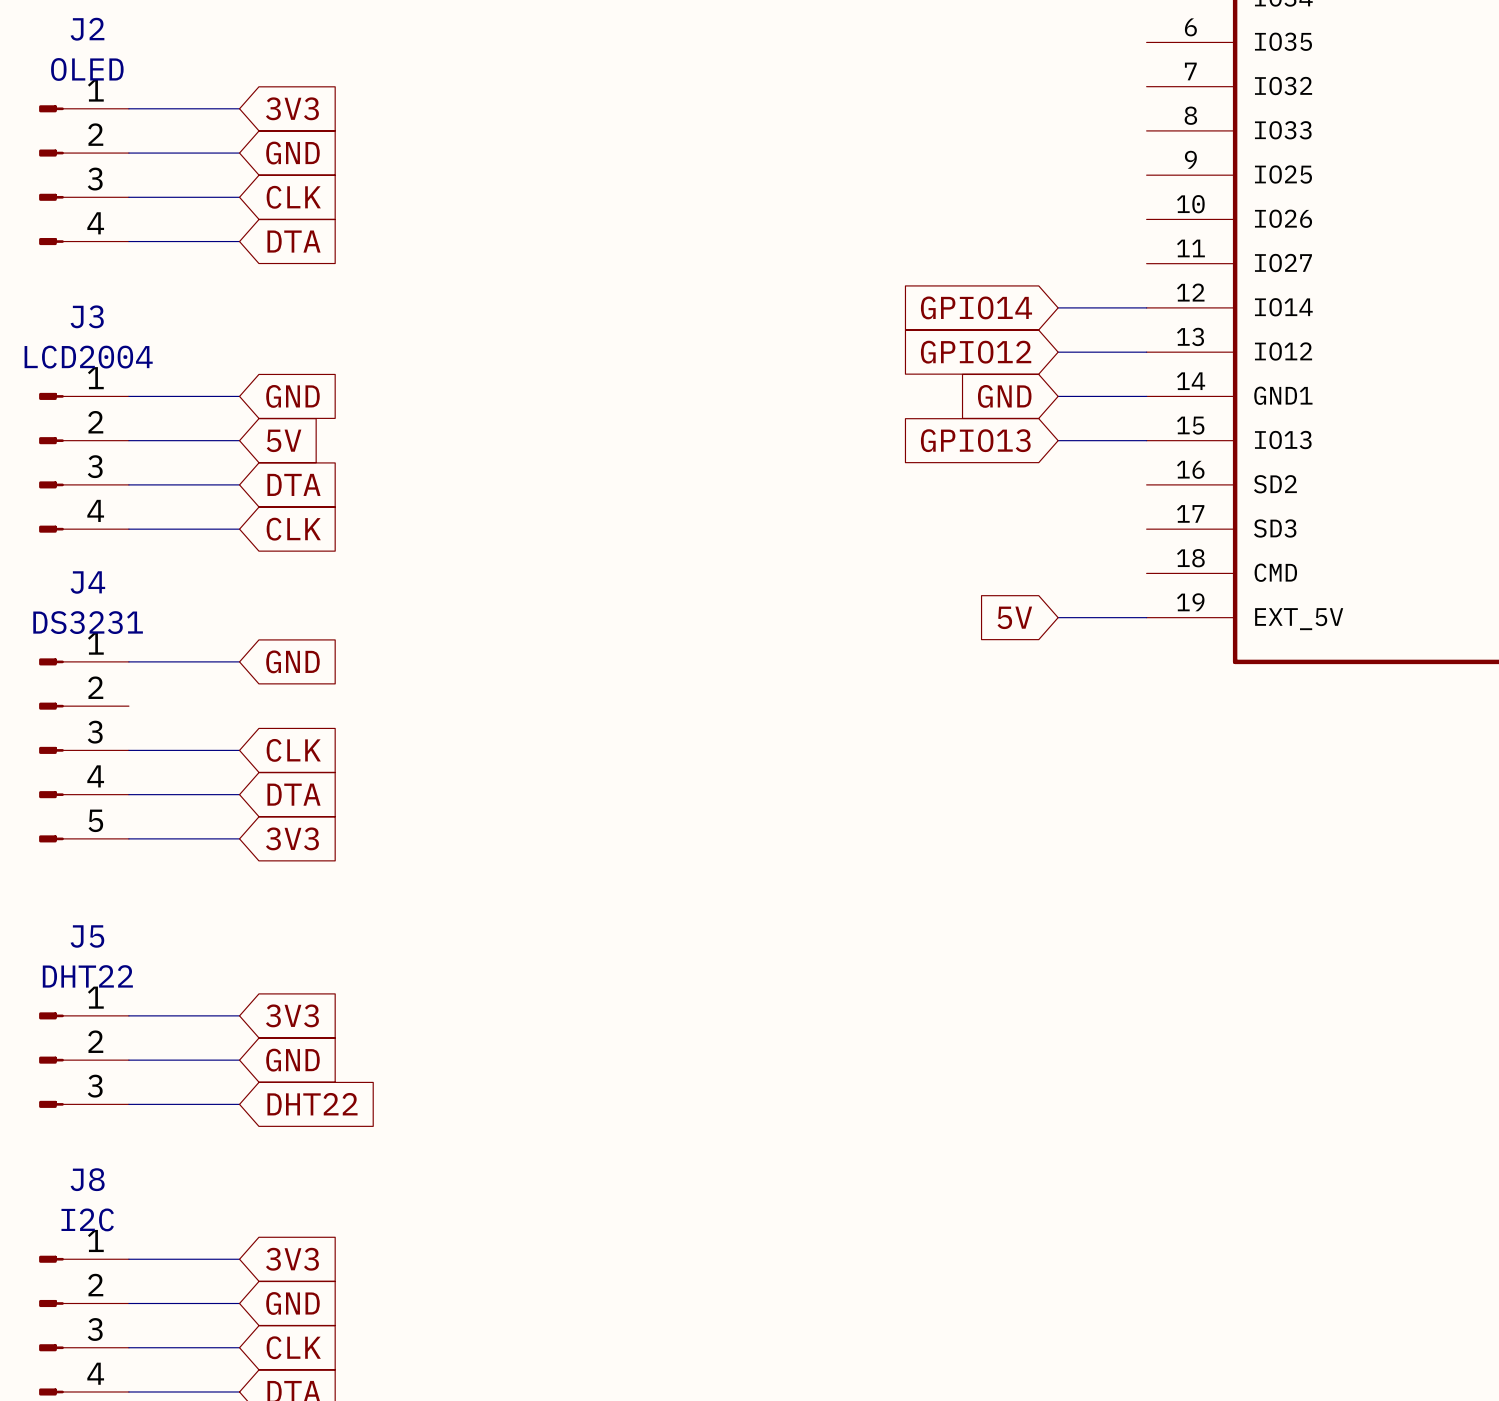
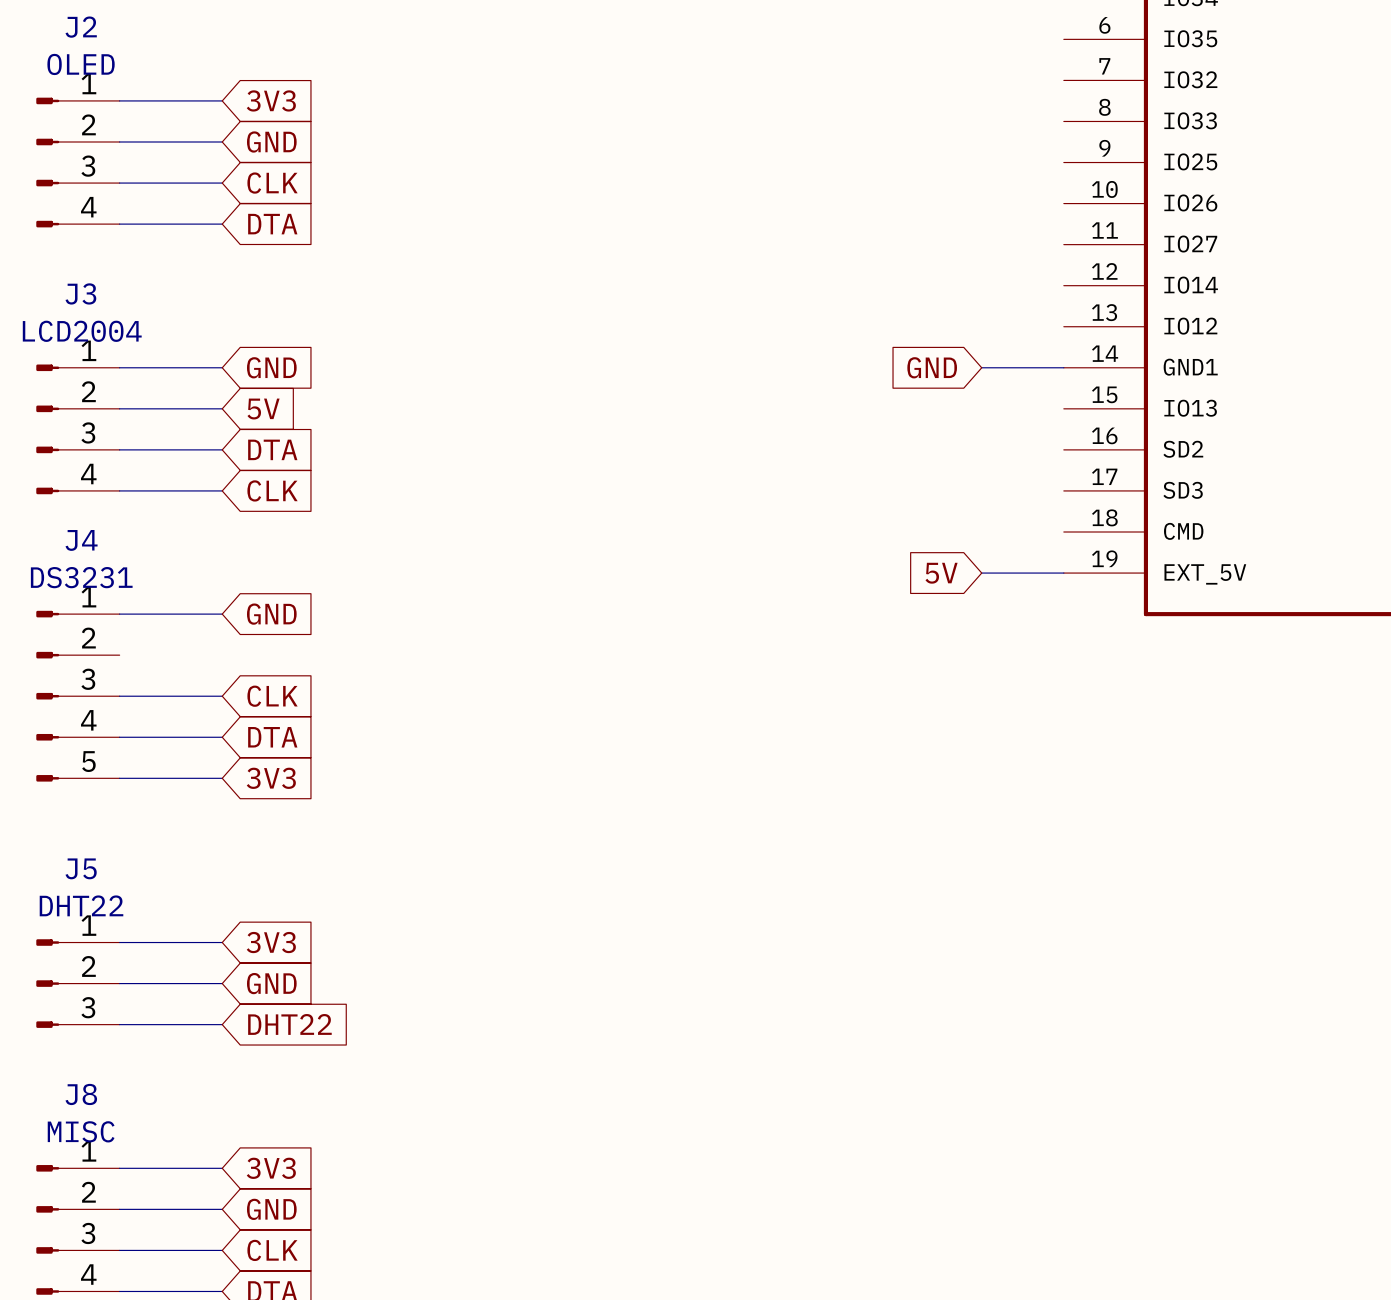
global label: GPIO14 (976, 307) -> none
wire: (1058, 307) (1146, 307) -> none
global label: GPIO12 (976, 352) -> none
wire: (1058, 352) (1146, 352) -> none
global label: GPIO13 (975, 440) -> none
wire: (1058, 440) (1146, 440) -> none
J8 value: I2C (87, 1219) -> MISC (81, 1131)

